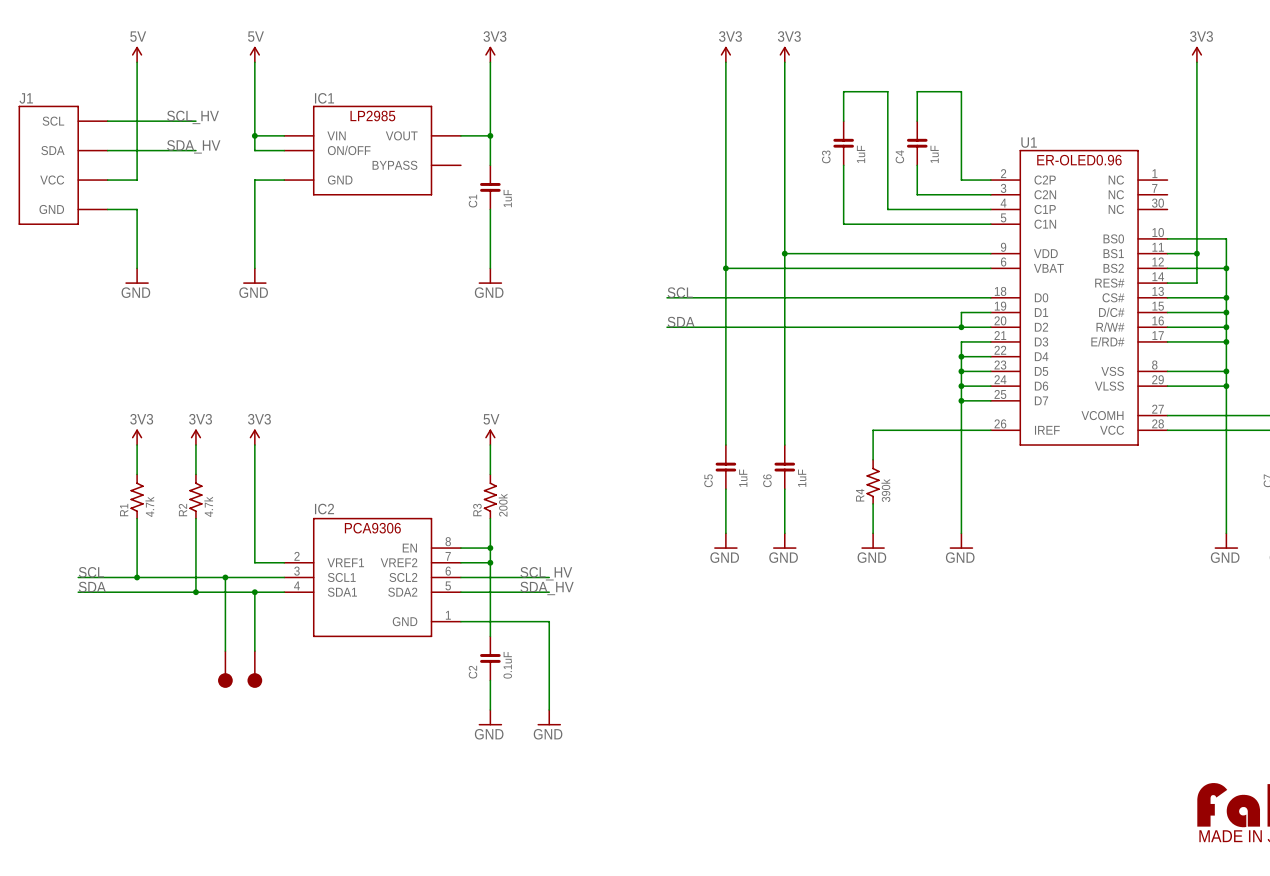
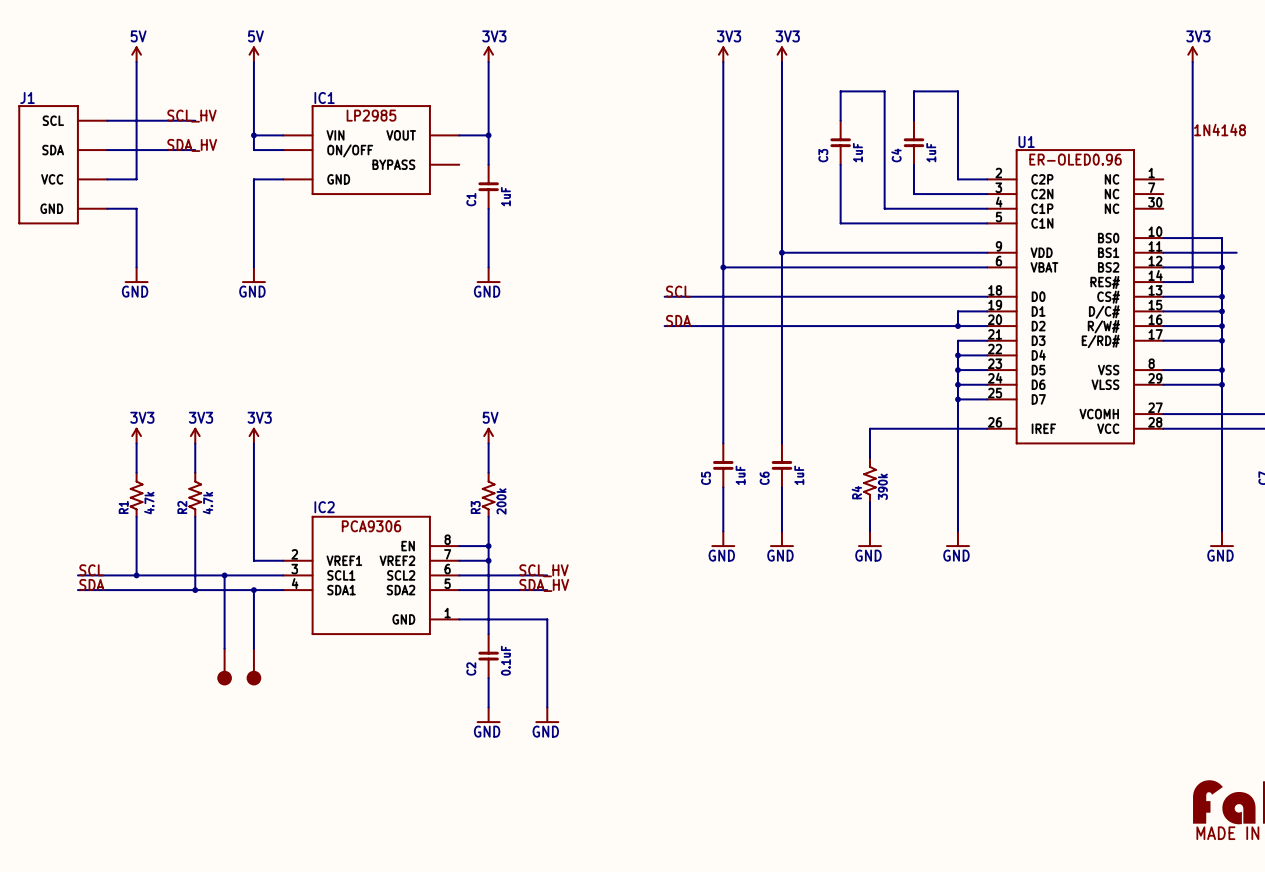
text: none -> 1N4148 (1220, 130)
wire: none -> (1192, 252) (1236, 252)
junction: (1196, 253) -> none

